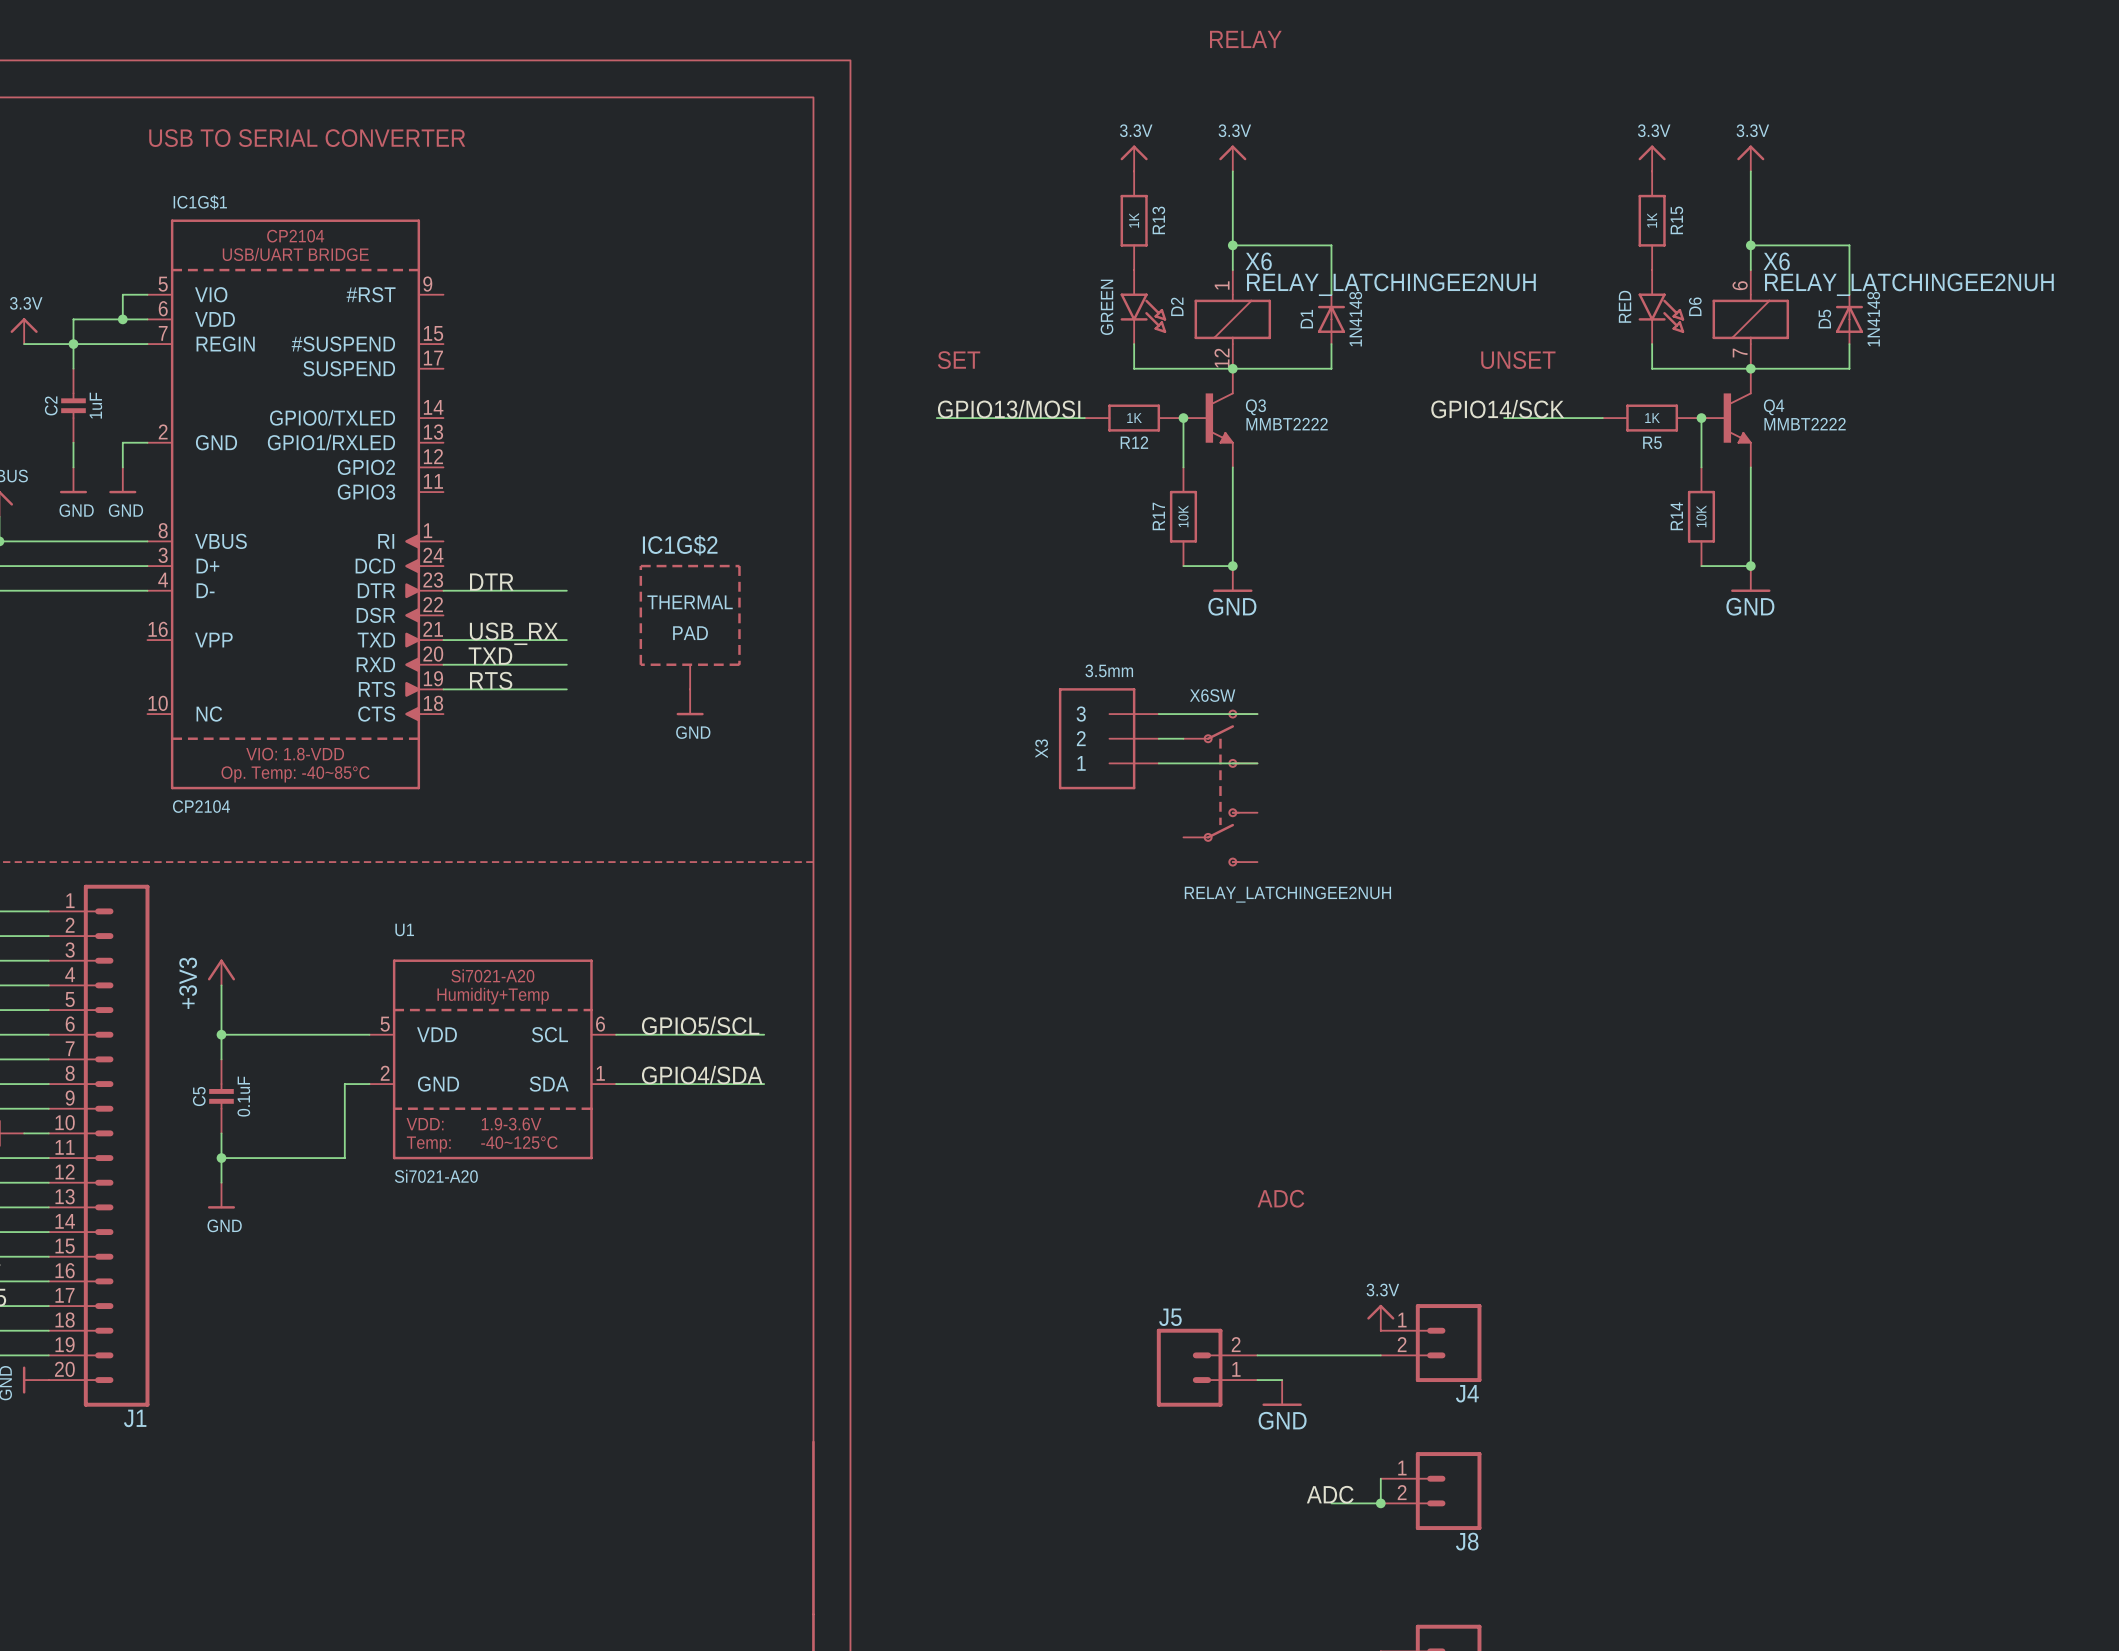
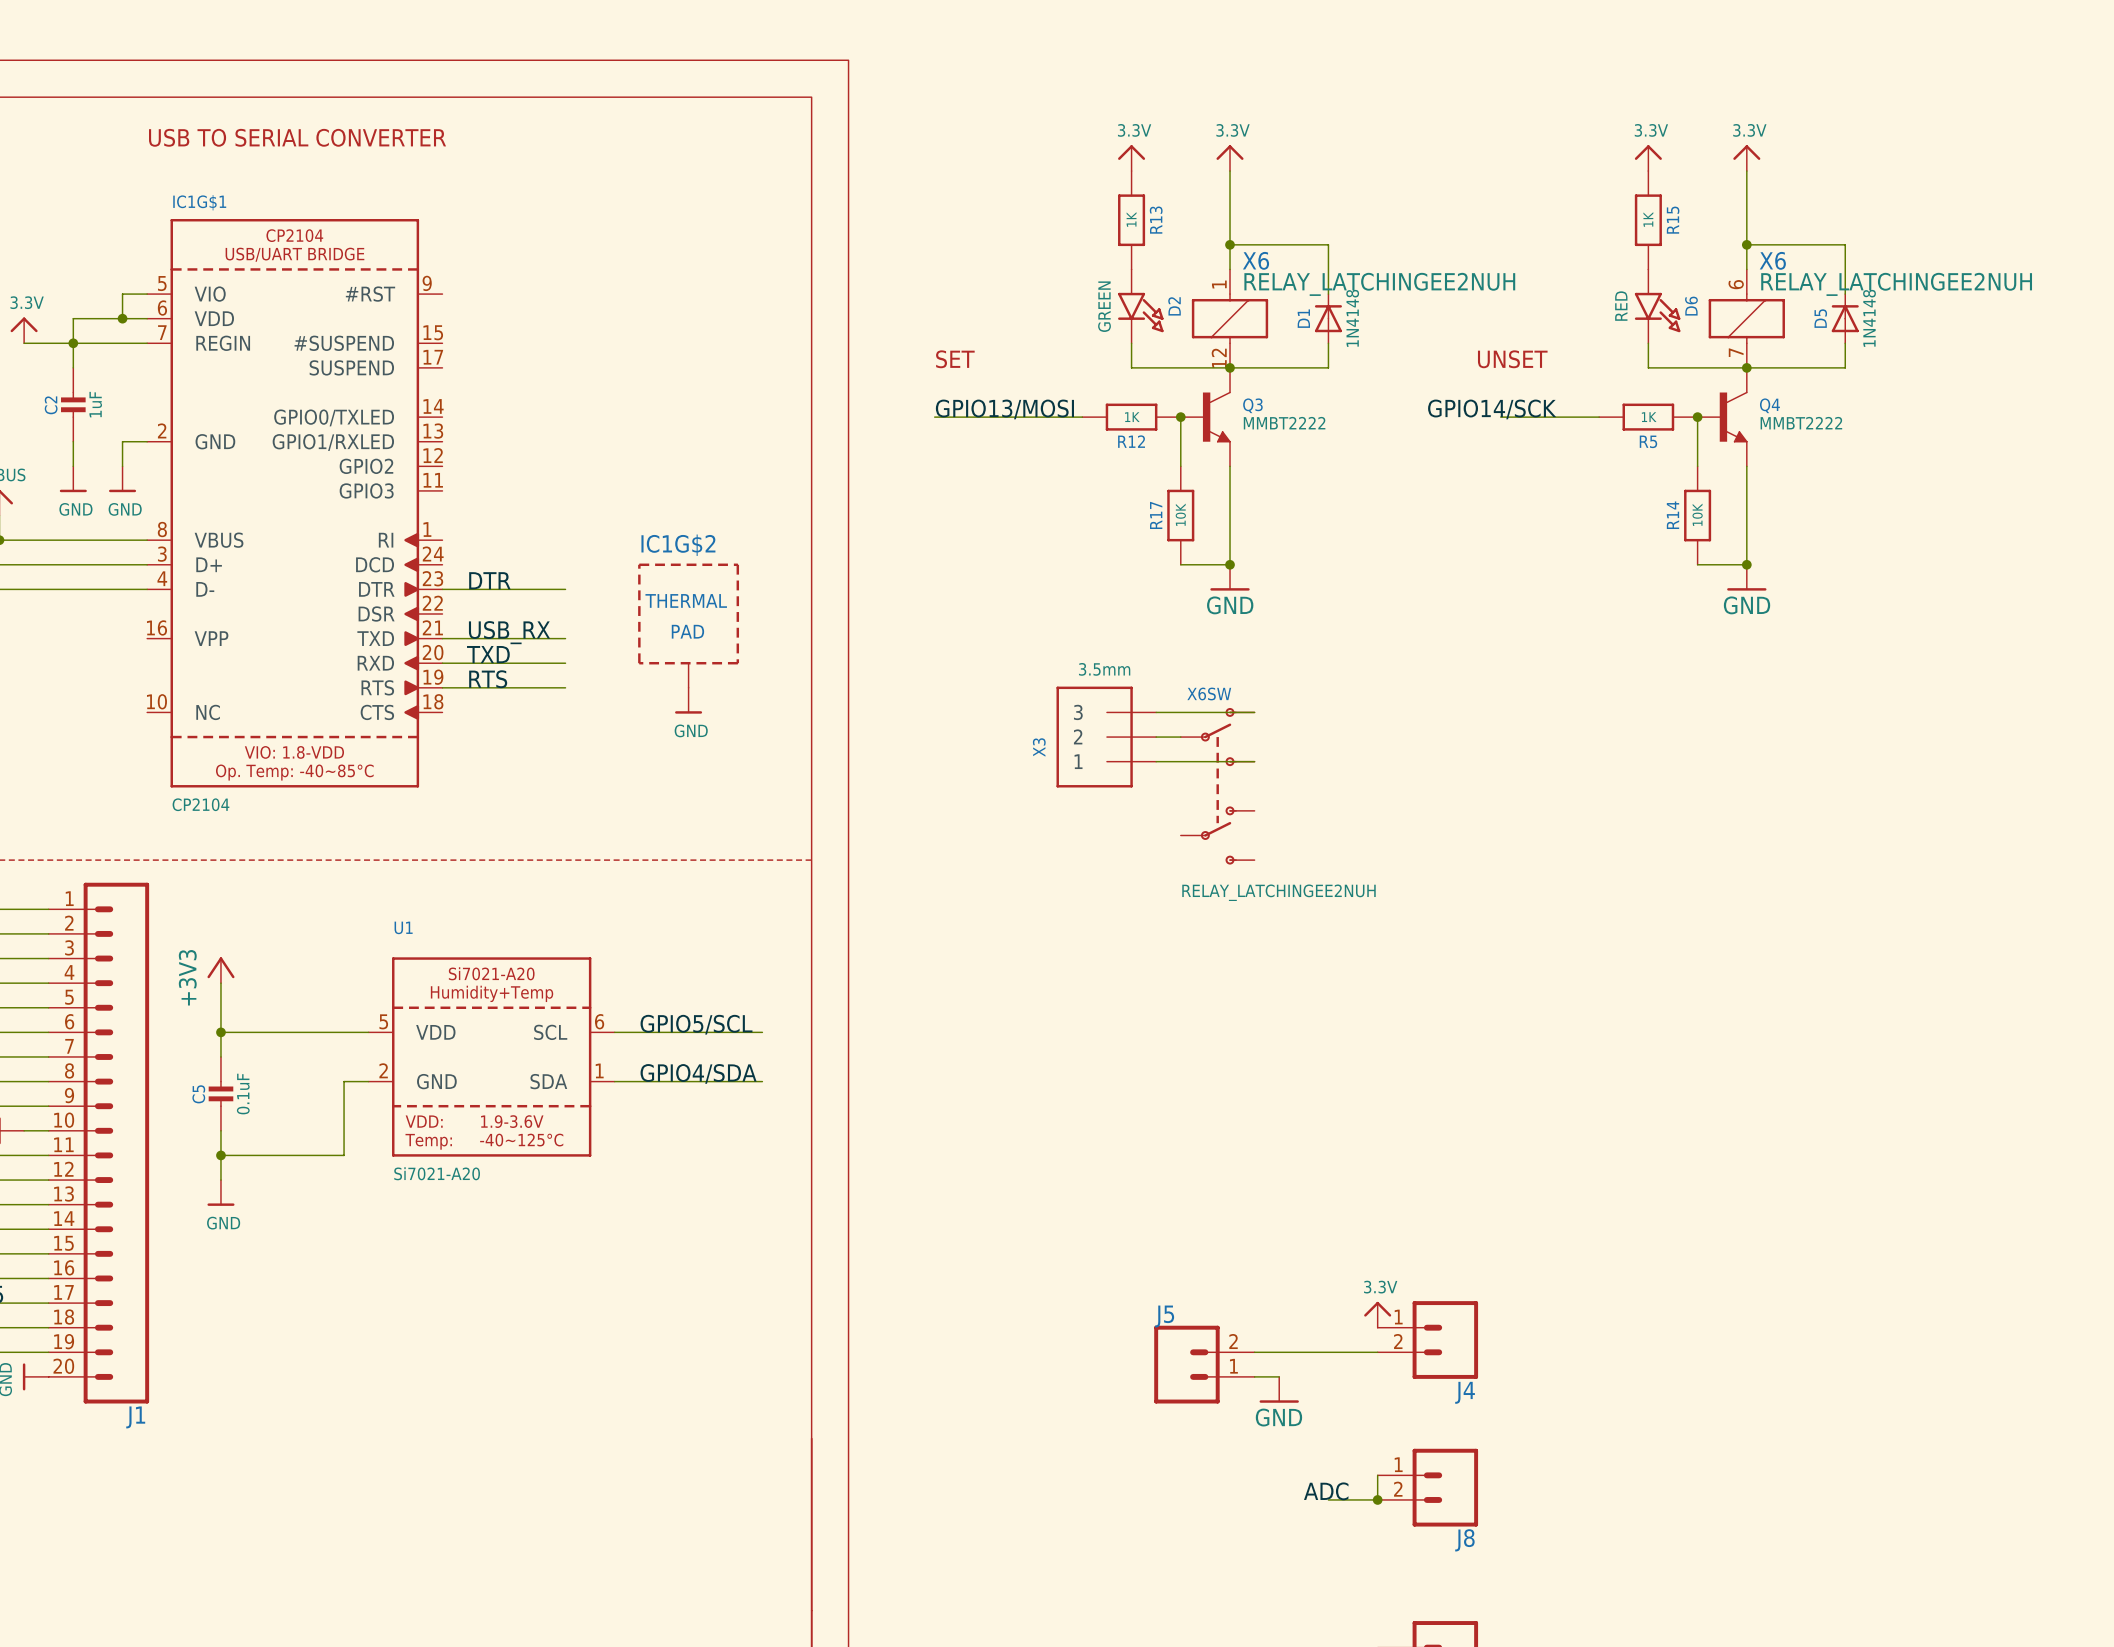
text: RELAY (1245, 39) -> none
text: ADC (1280, 1198) -> none

